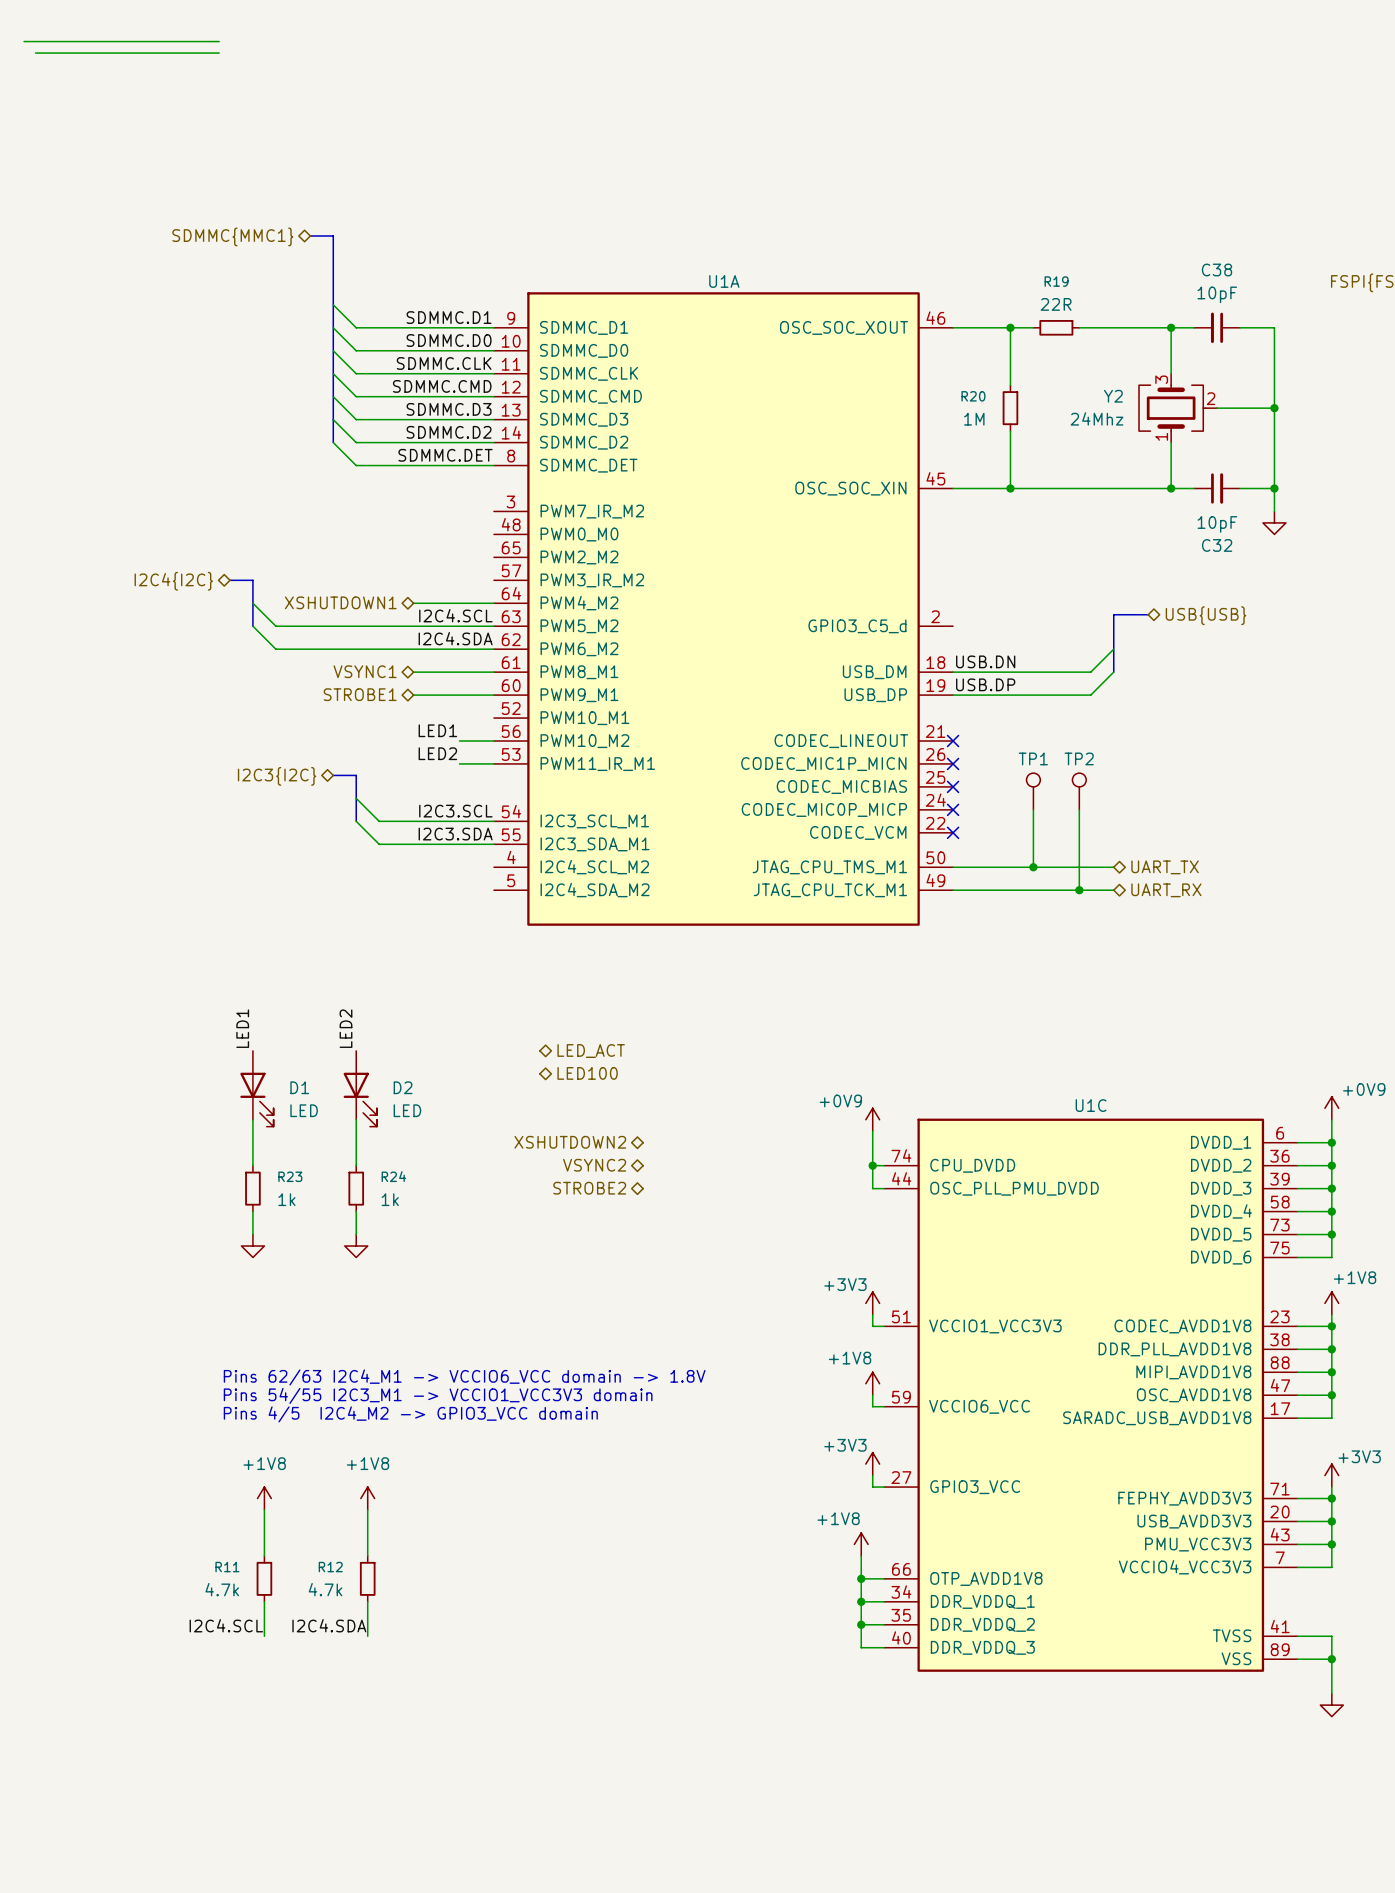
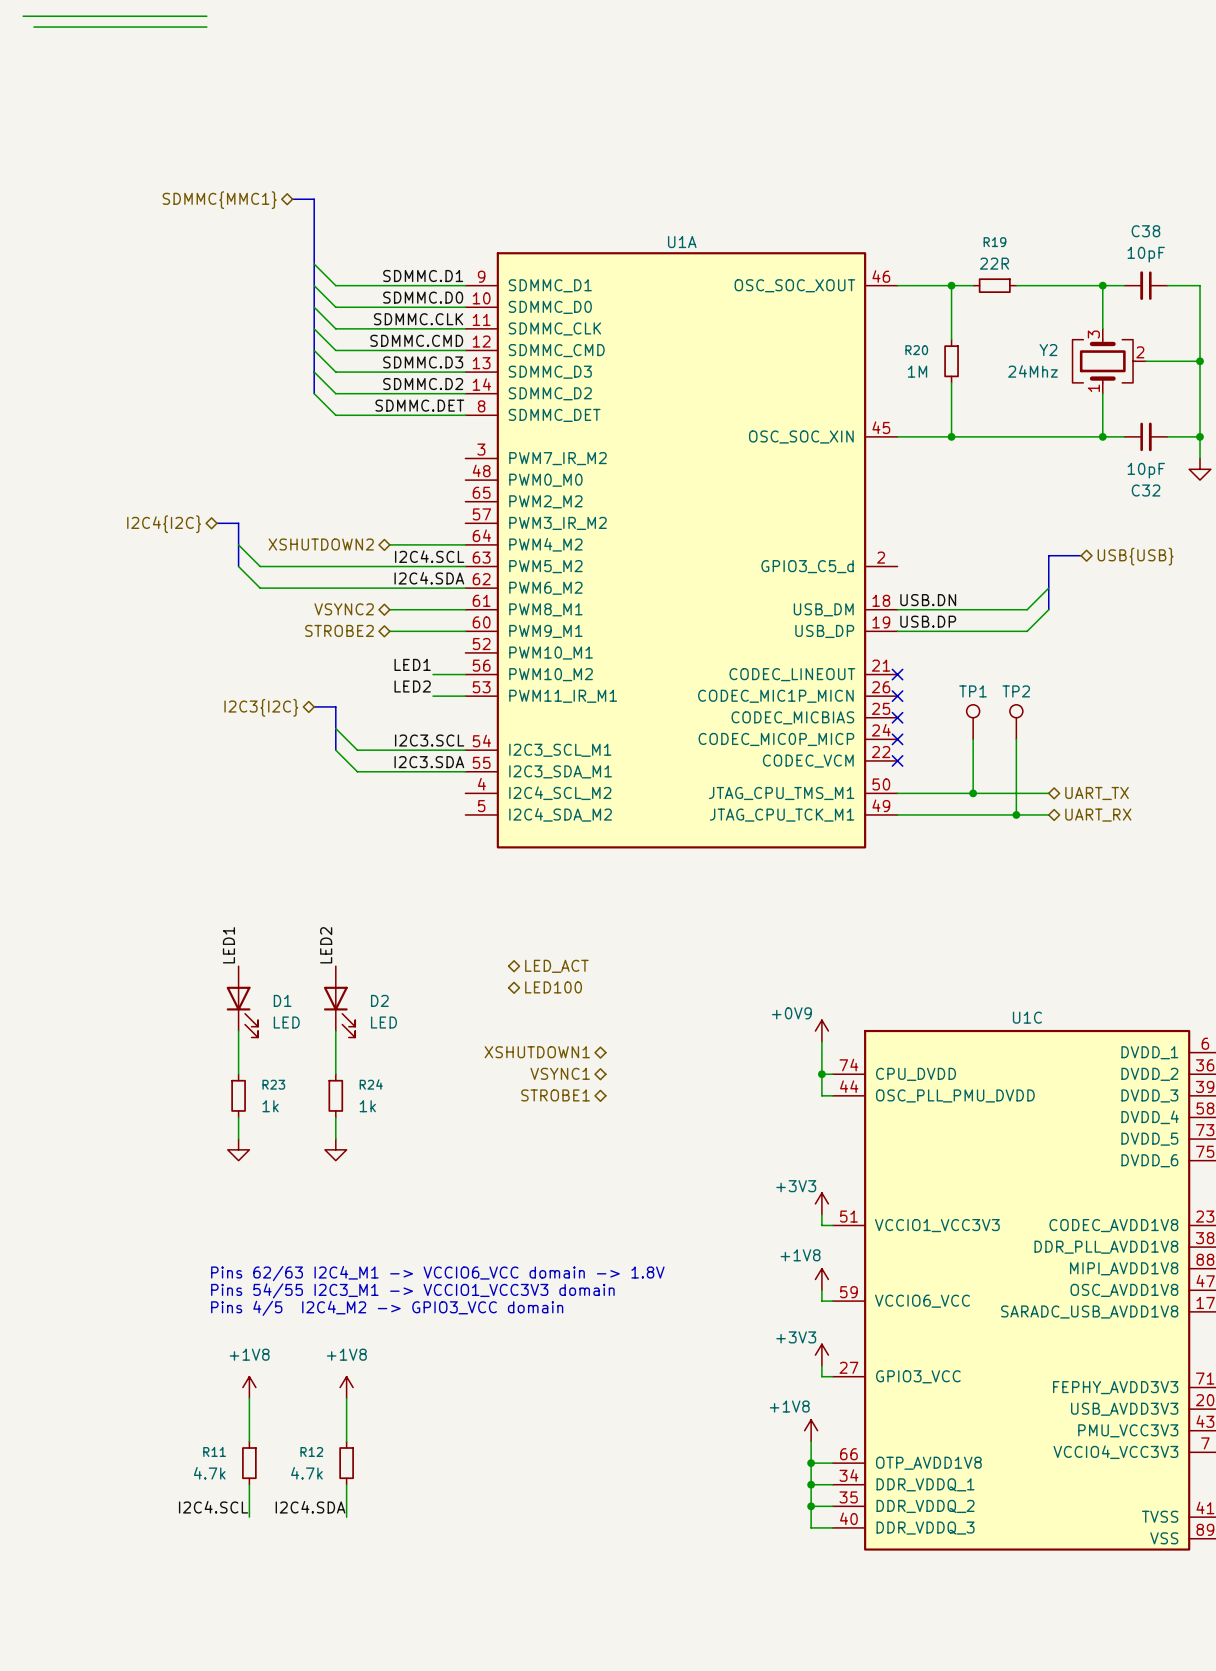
hierarchical label: XSHUTDOWN1 (340, 602) -> XSHUTDOWN2 (321, 544)
hierarchical label: VSYNC1 (365, 671) -> VSYNC2 (344, 609)
hierarchical label: STROBE1 (360, 694) -> STROBE2 (339, 630)
hierarchical label: XSHUTDOWN2 (570, 1142) -> XSHUTDOWN1 (537, 1052)
hierarchical label: VSYNC2 (594, 1165) -> VSYNC1 (560, 1073)
hierarchical label: STROBE2 (589, 1188) -> STROBE1 (555, 1095)

